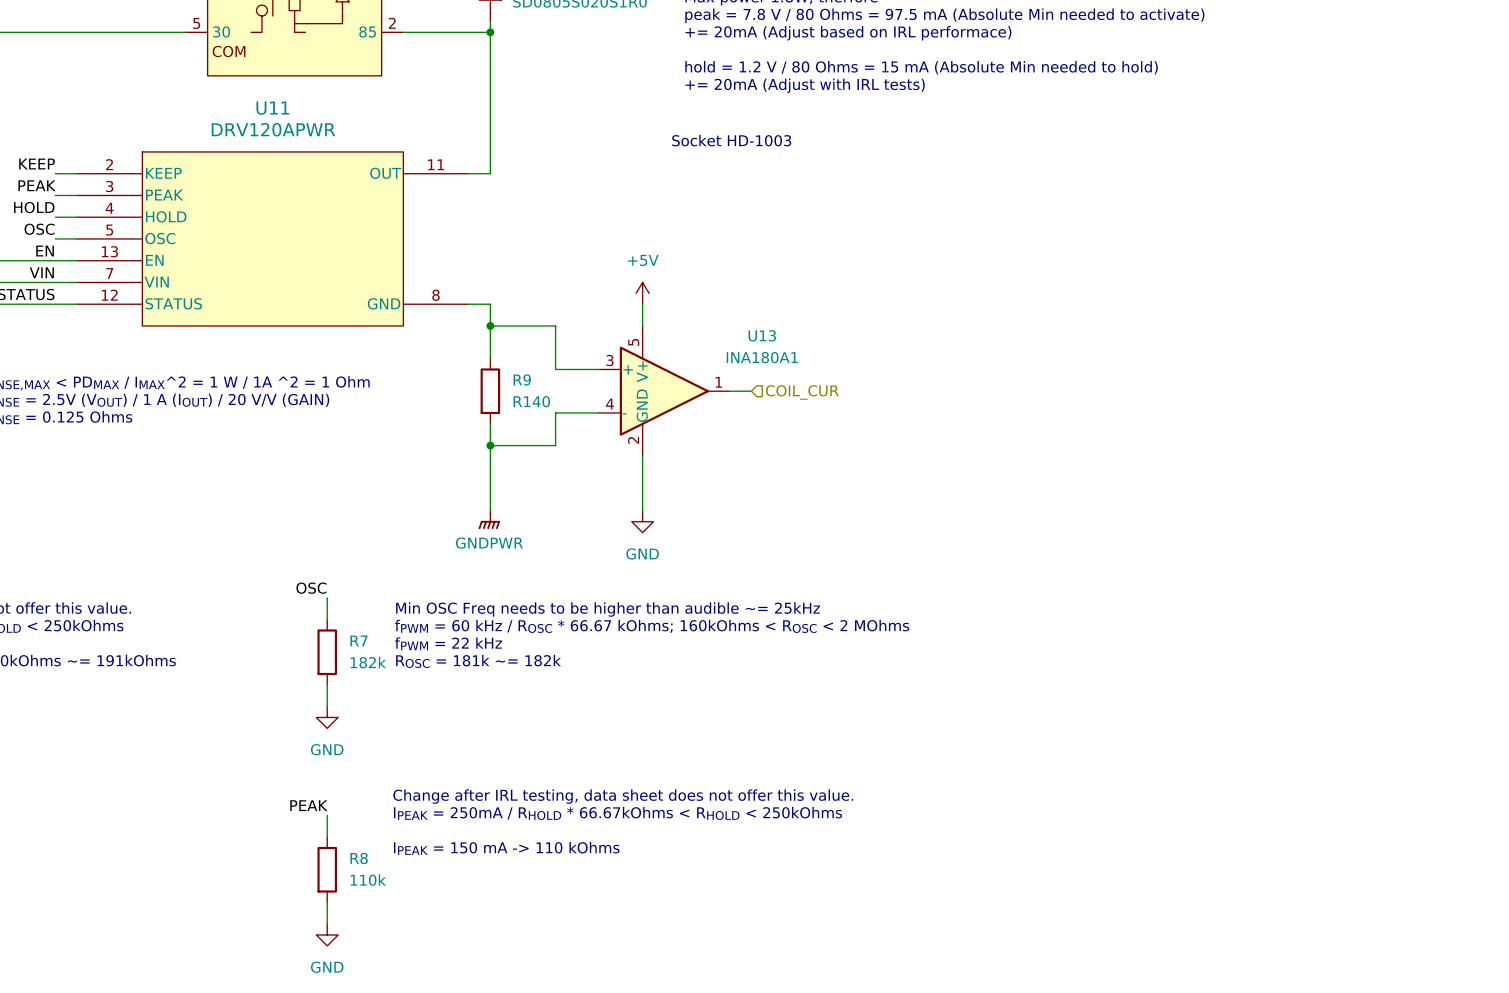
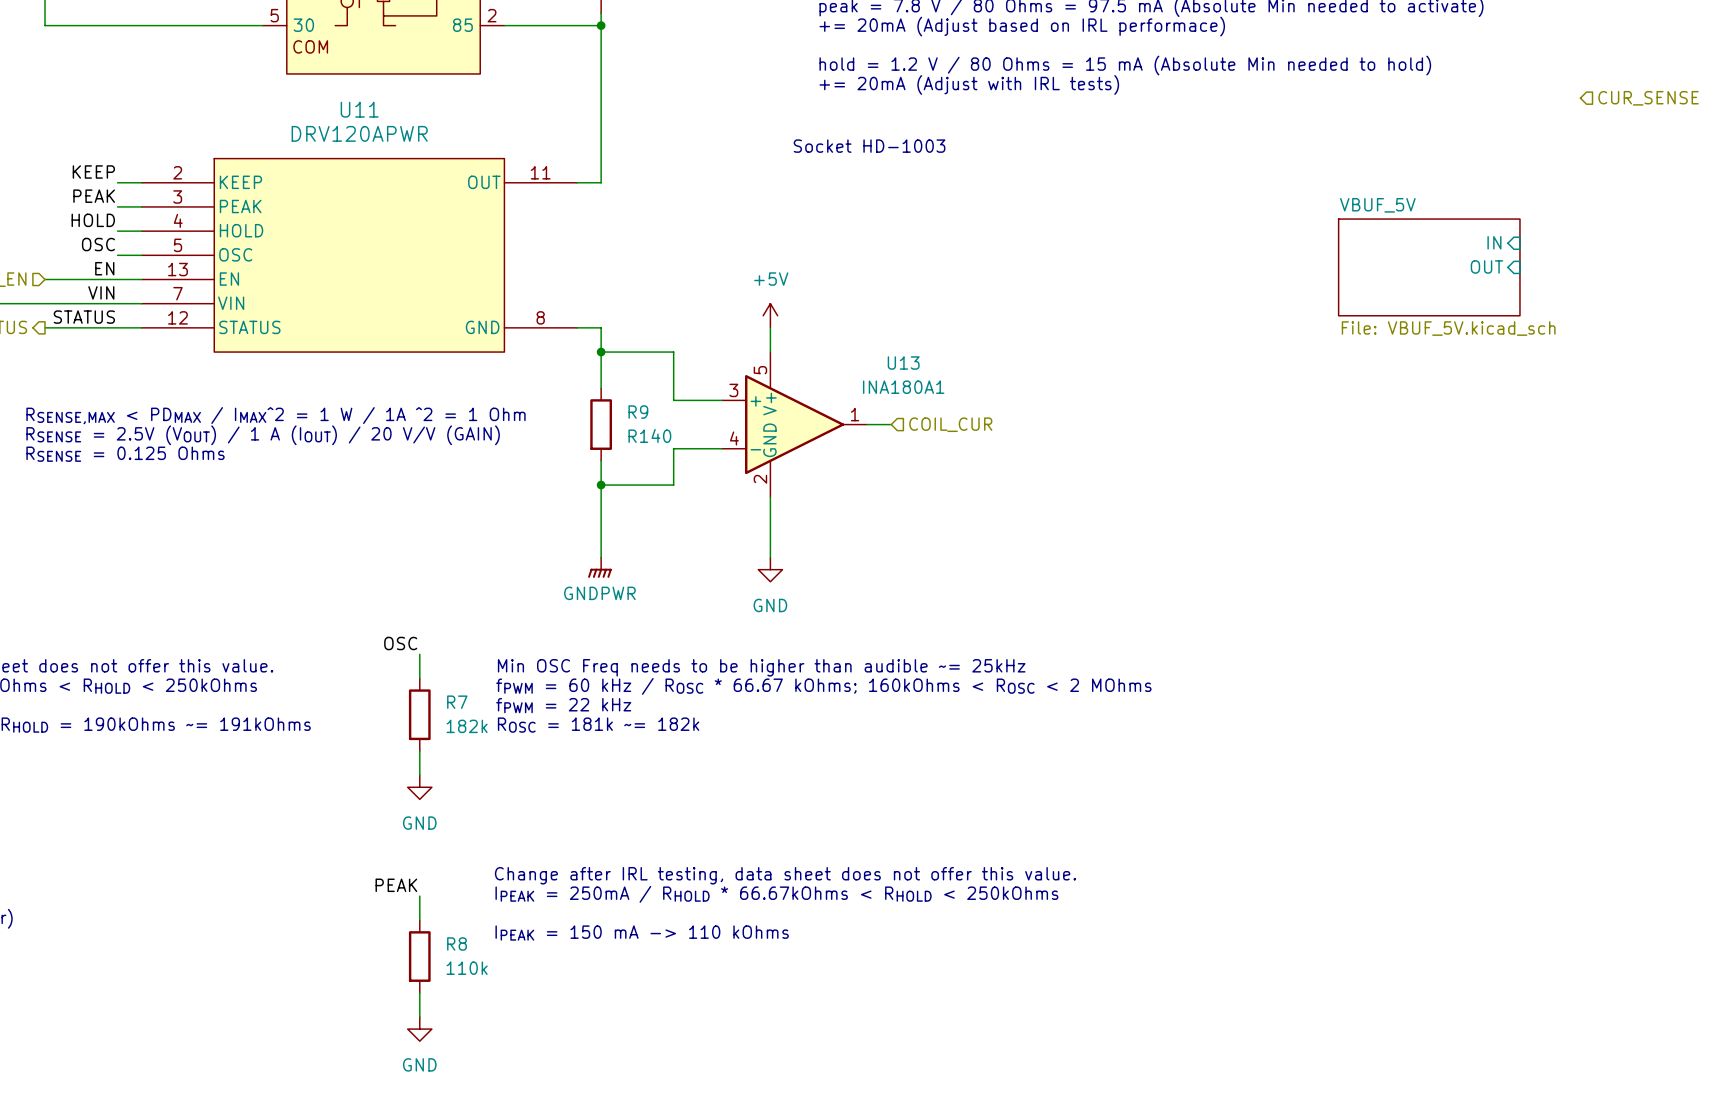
hierarchical label: none -> CUR_SENSE (1648, 98)
sheet pin: none -> IN (1494, 242)
sheet VBUF_5V: none -> File: VBUF_5V.kicad_sch (1429, 267)
sheet pin: none -> OUT (1486, 266)

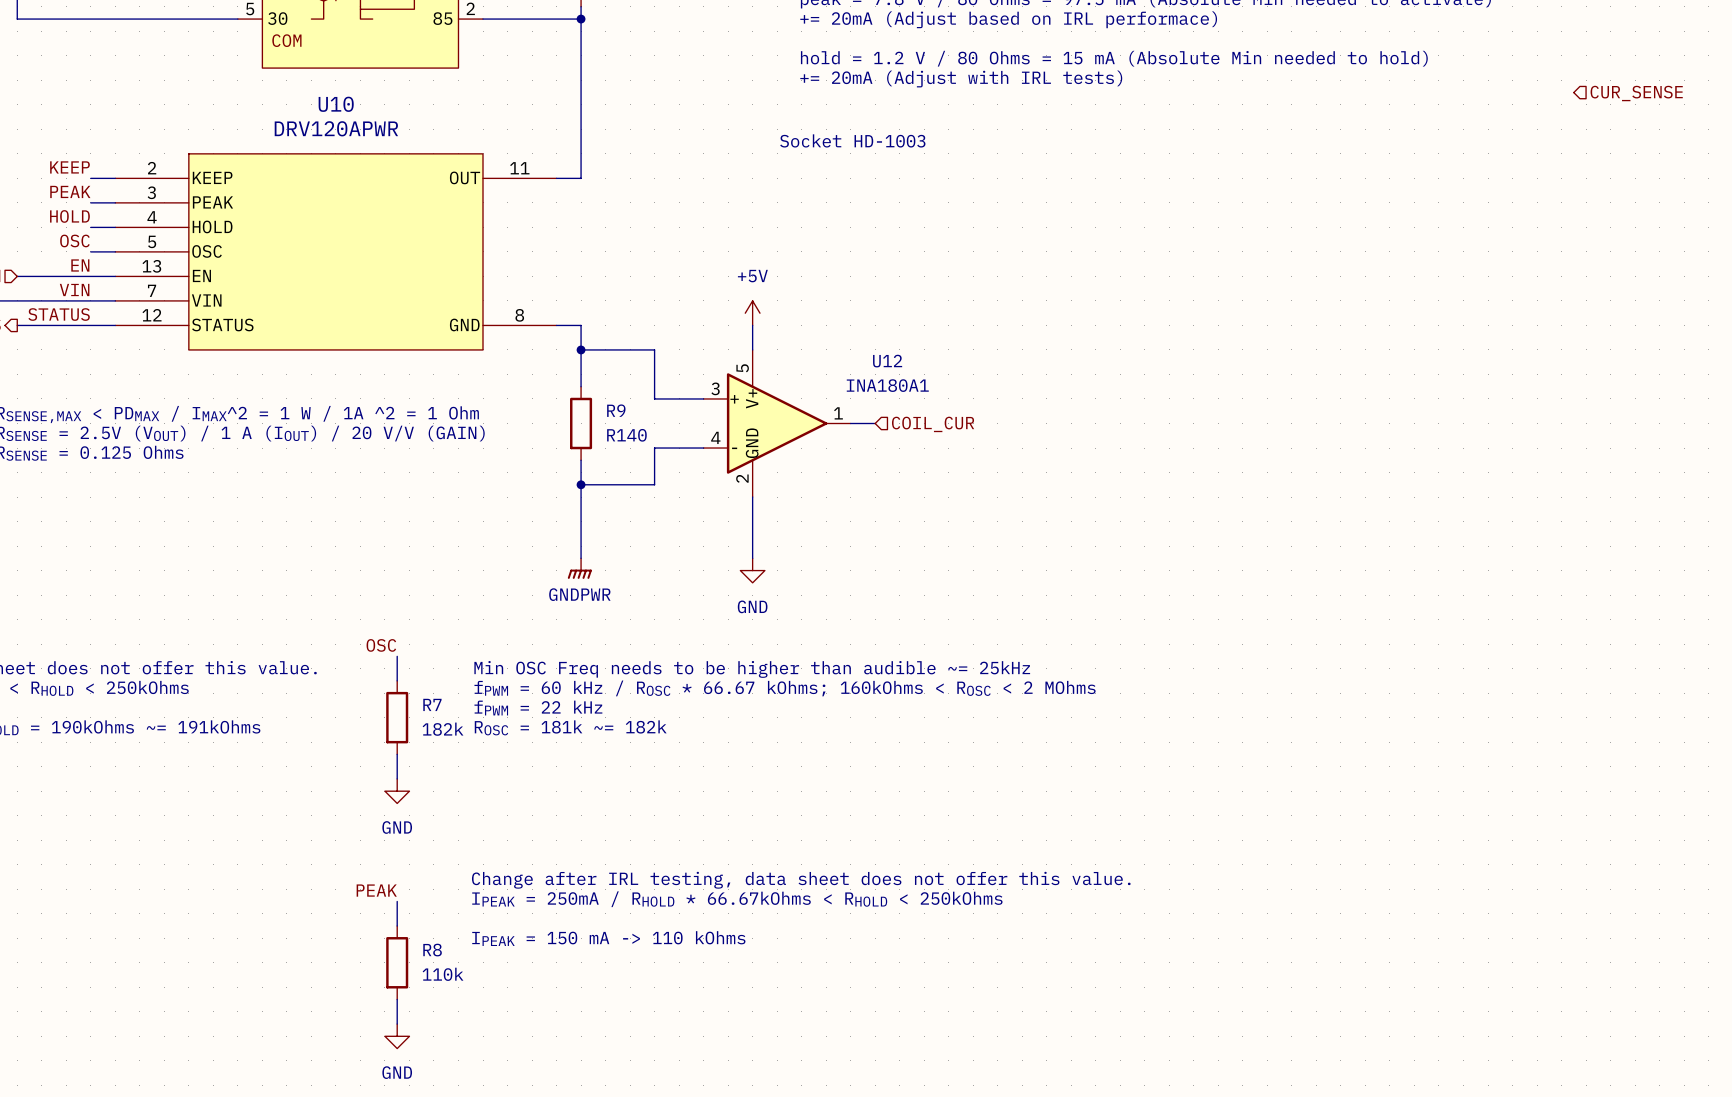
U11 name: U11 (359, 109) -> U10 (336, 104)
sheet pin: IN (1494, 242) -> none
sheet pin: OUT (1486, 266) -> none
sheet VBUF_5V: File: VBUF_5V.kicad_sch (1429, 267) -> none
U13 name: U13 (903, 363) -> U12 (887, 361)

